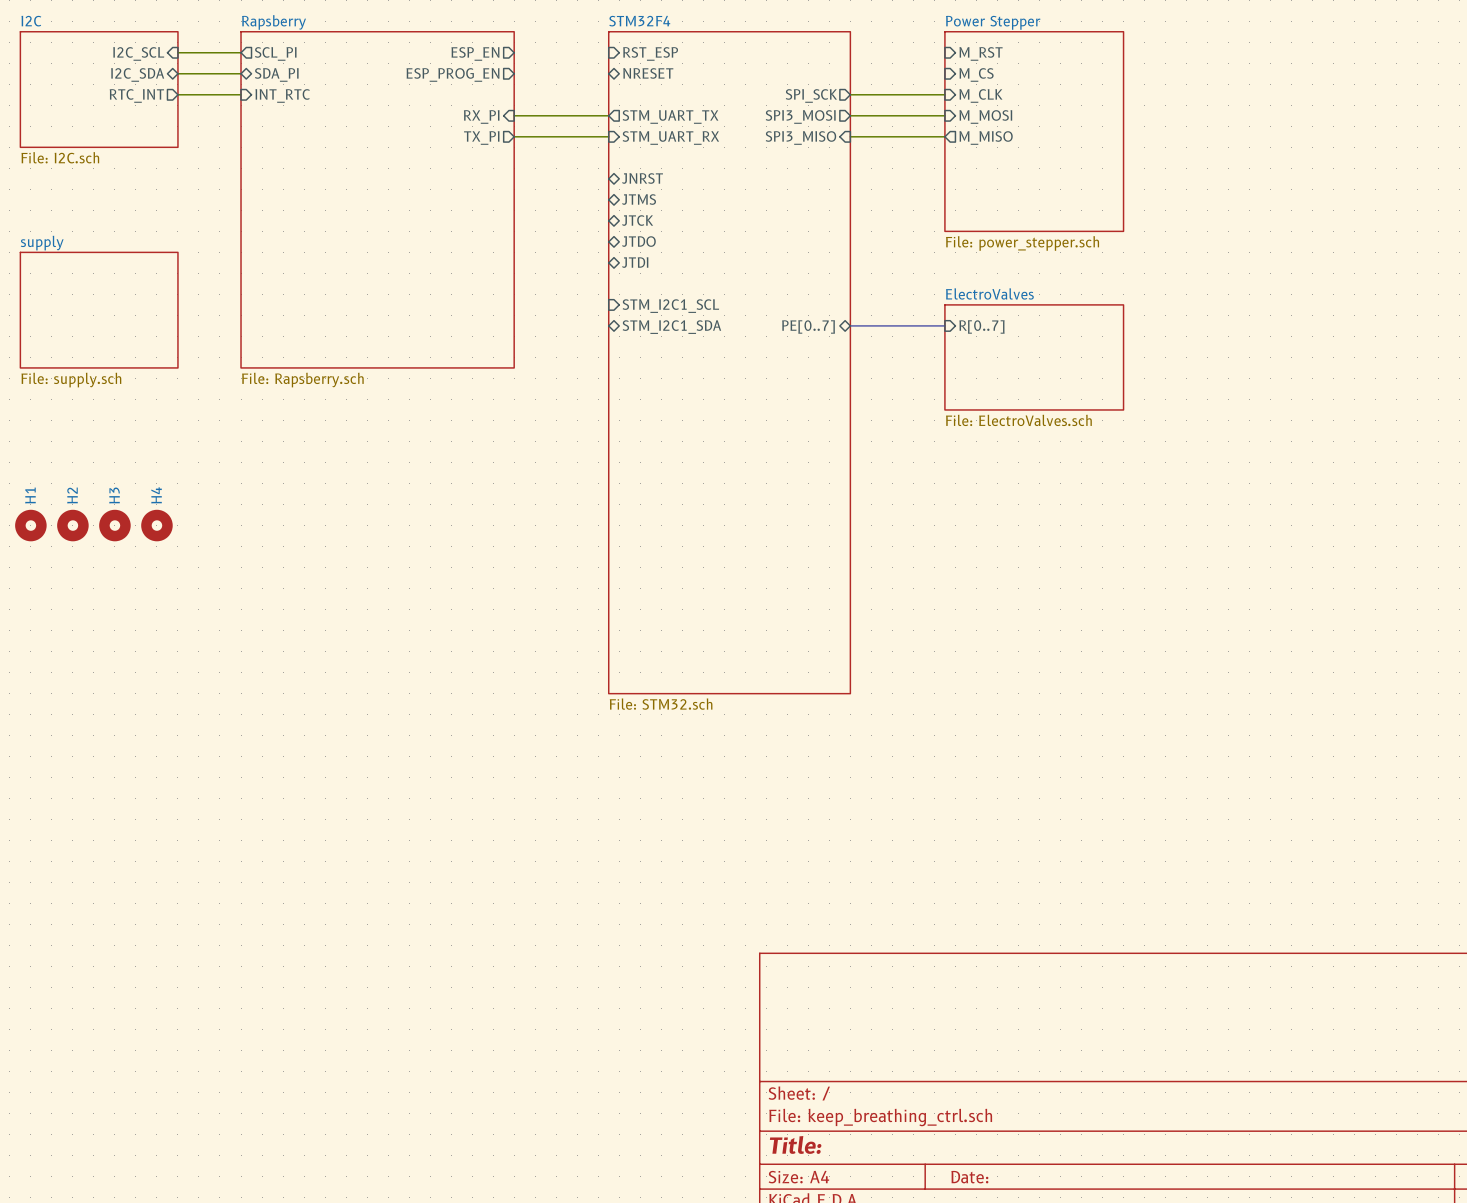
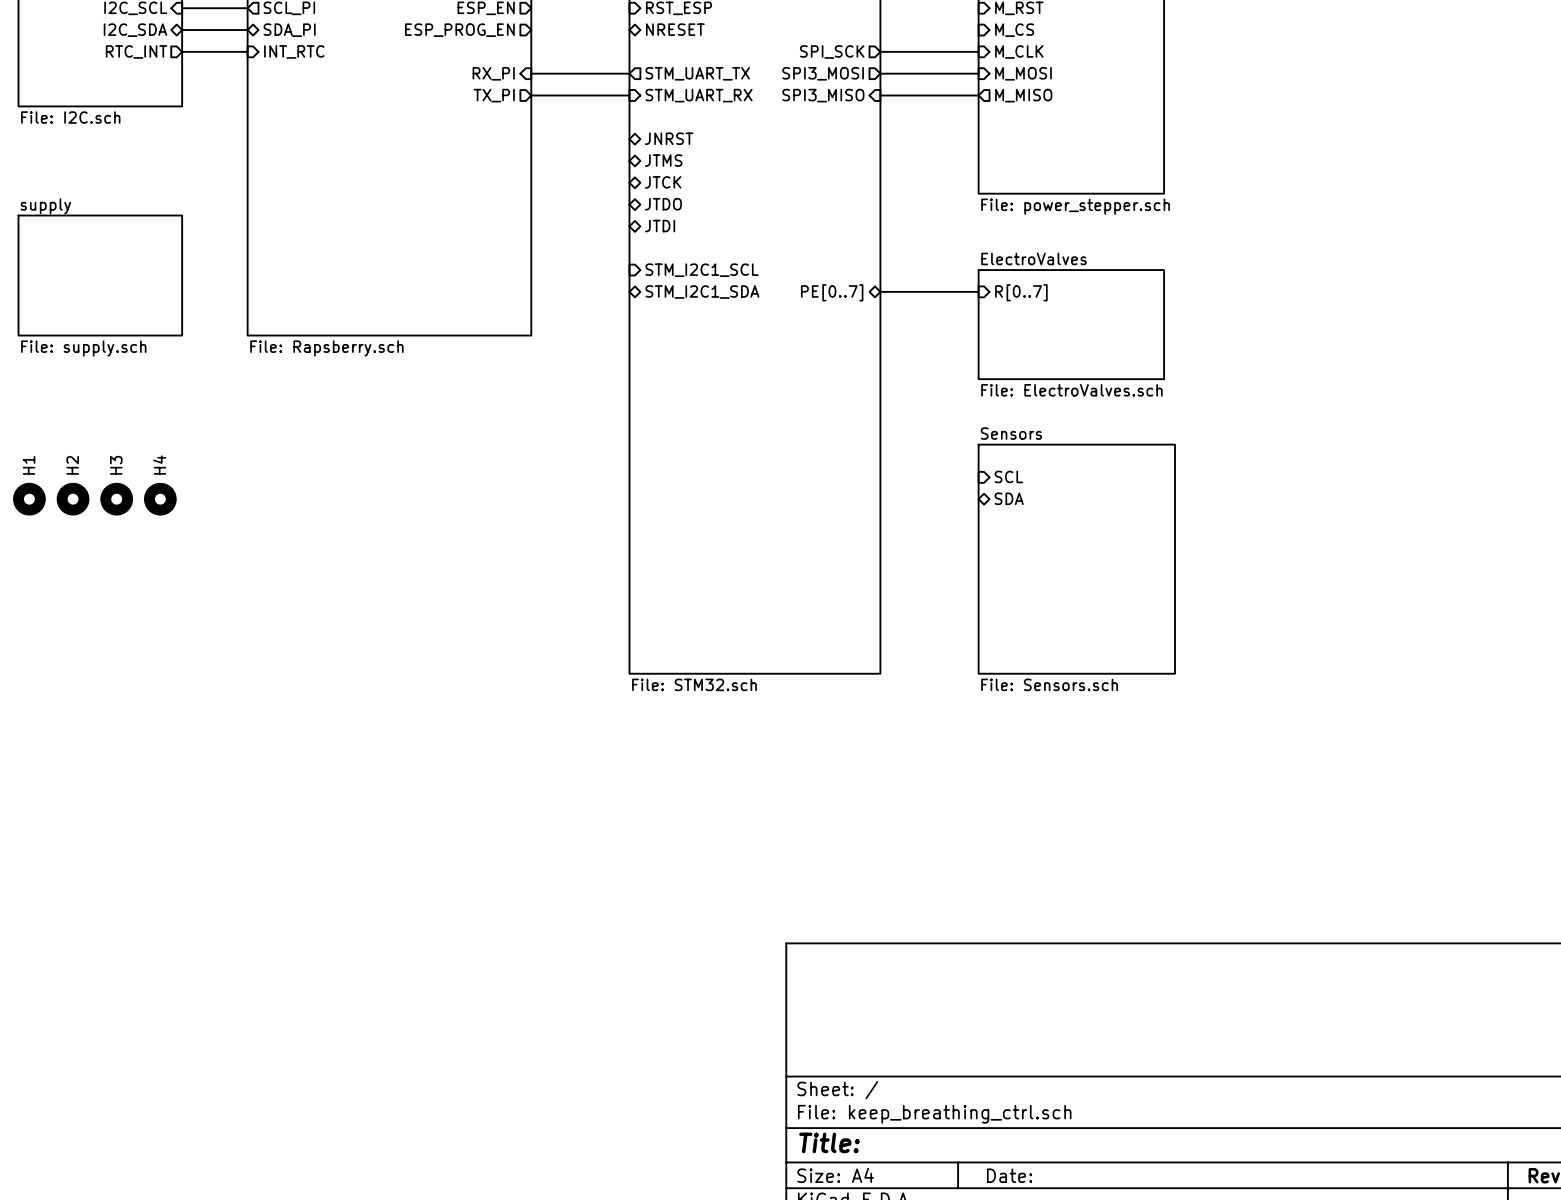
sheet pin: none -> SCL (1008, 476)
sheet pin: none -> SDA (1009, 498)
sheet Sensors: none -> File: Sensors.sch (1076, 559)

